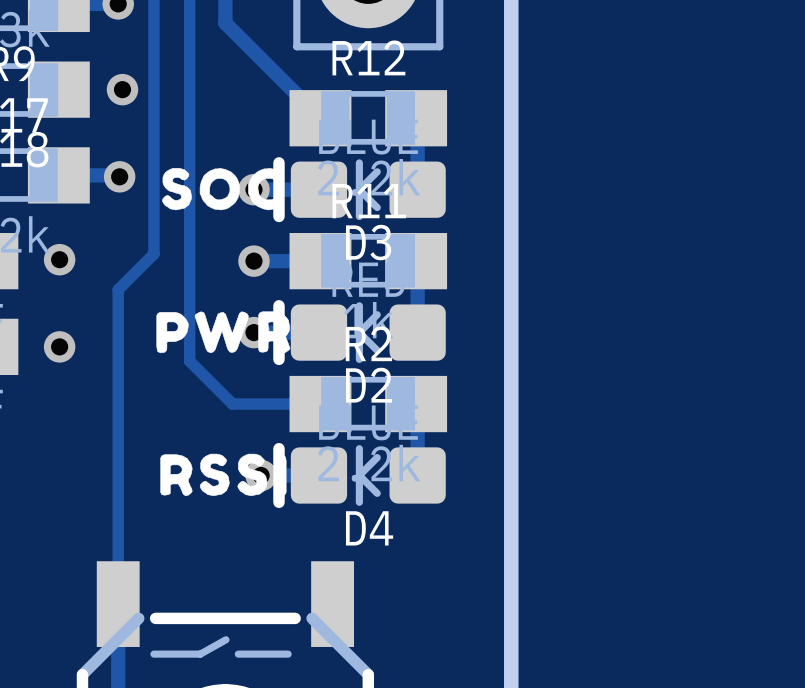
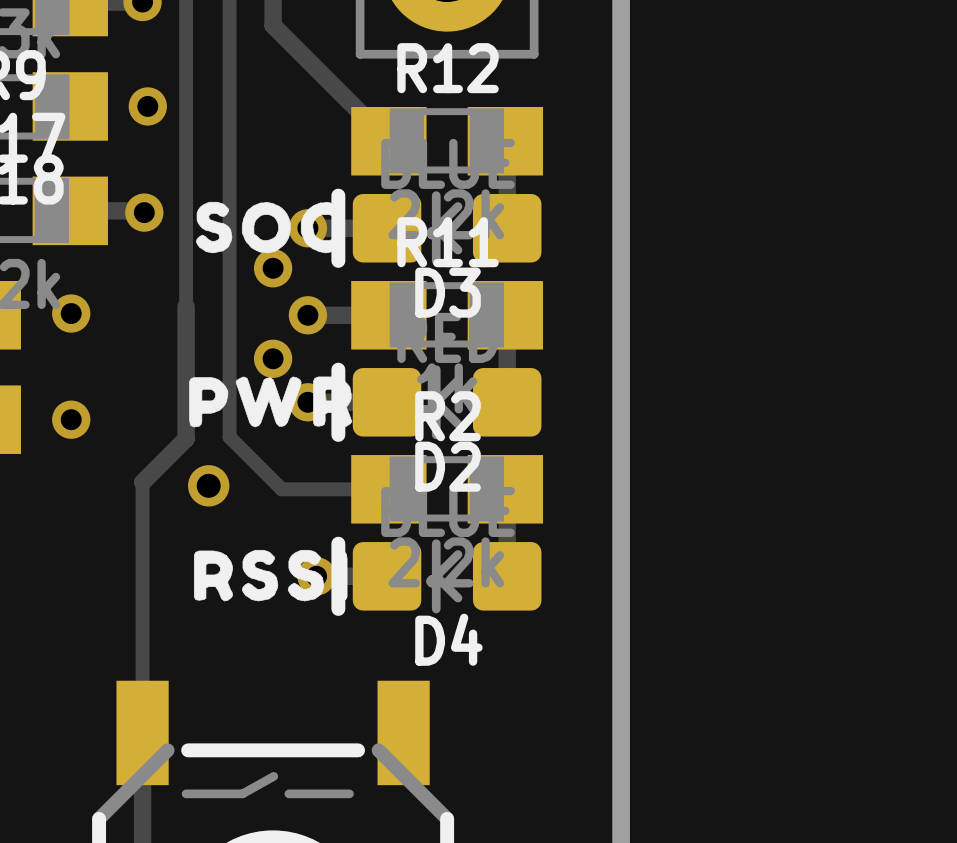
via: none -> (273, 268)
track: (153, 253) (118, 289) (118, 398) -> (186, 306) (186, 438) (142, 482)
via: none -> (273, 358)
via: none -> (208, 485)

